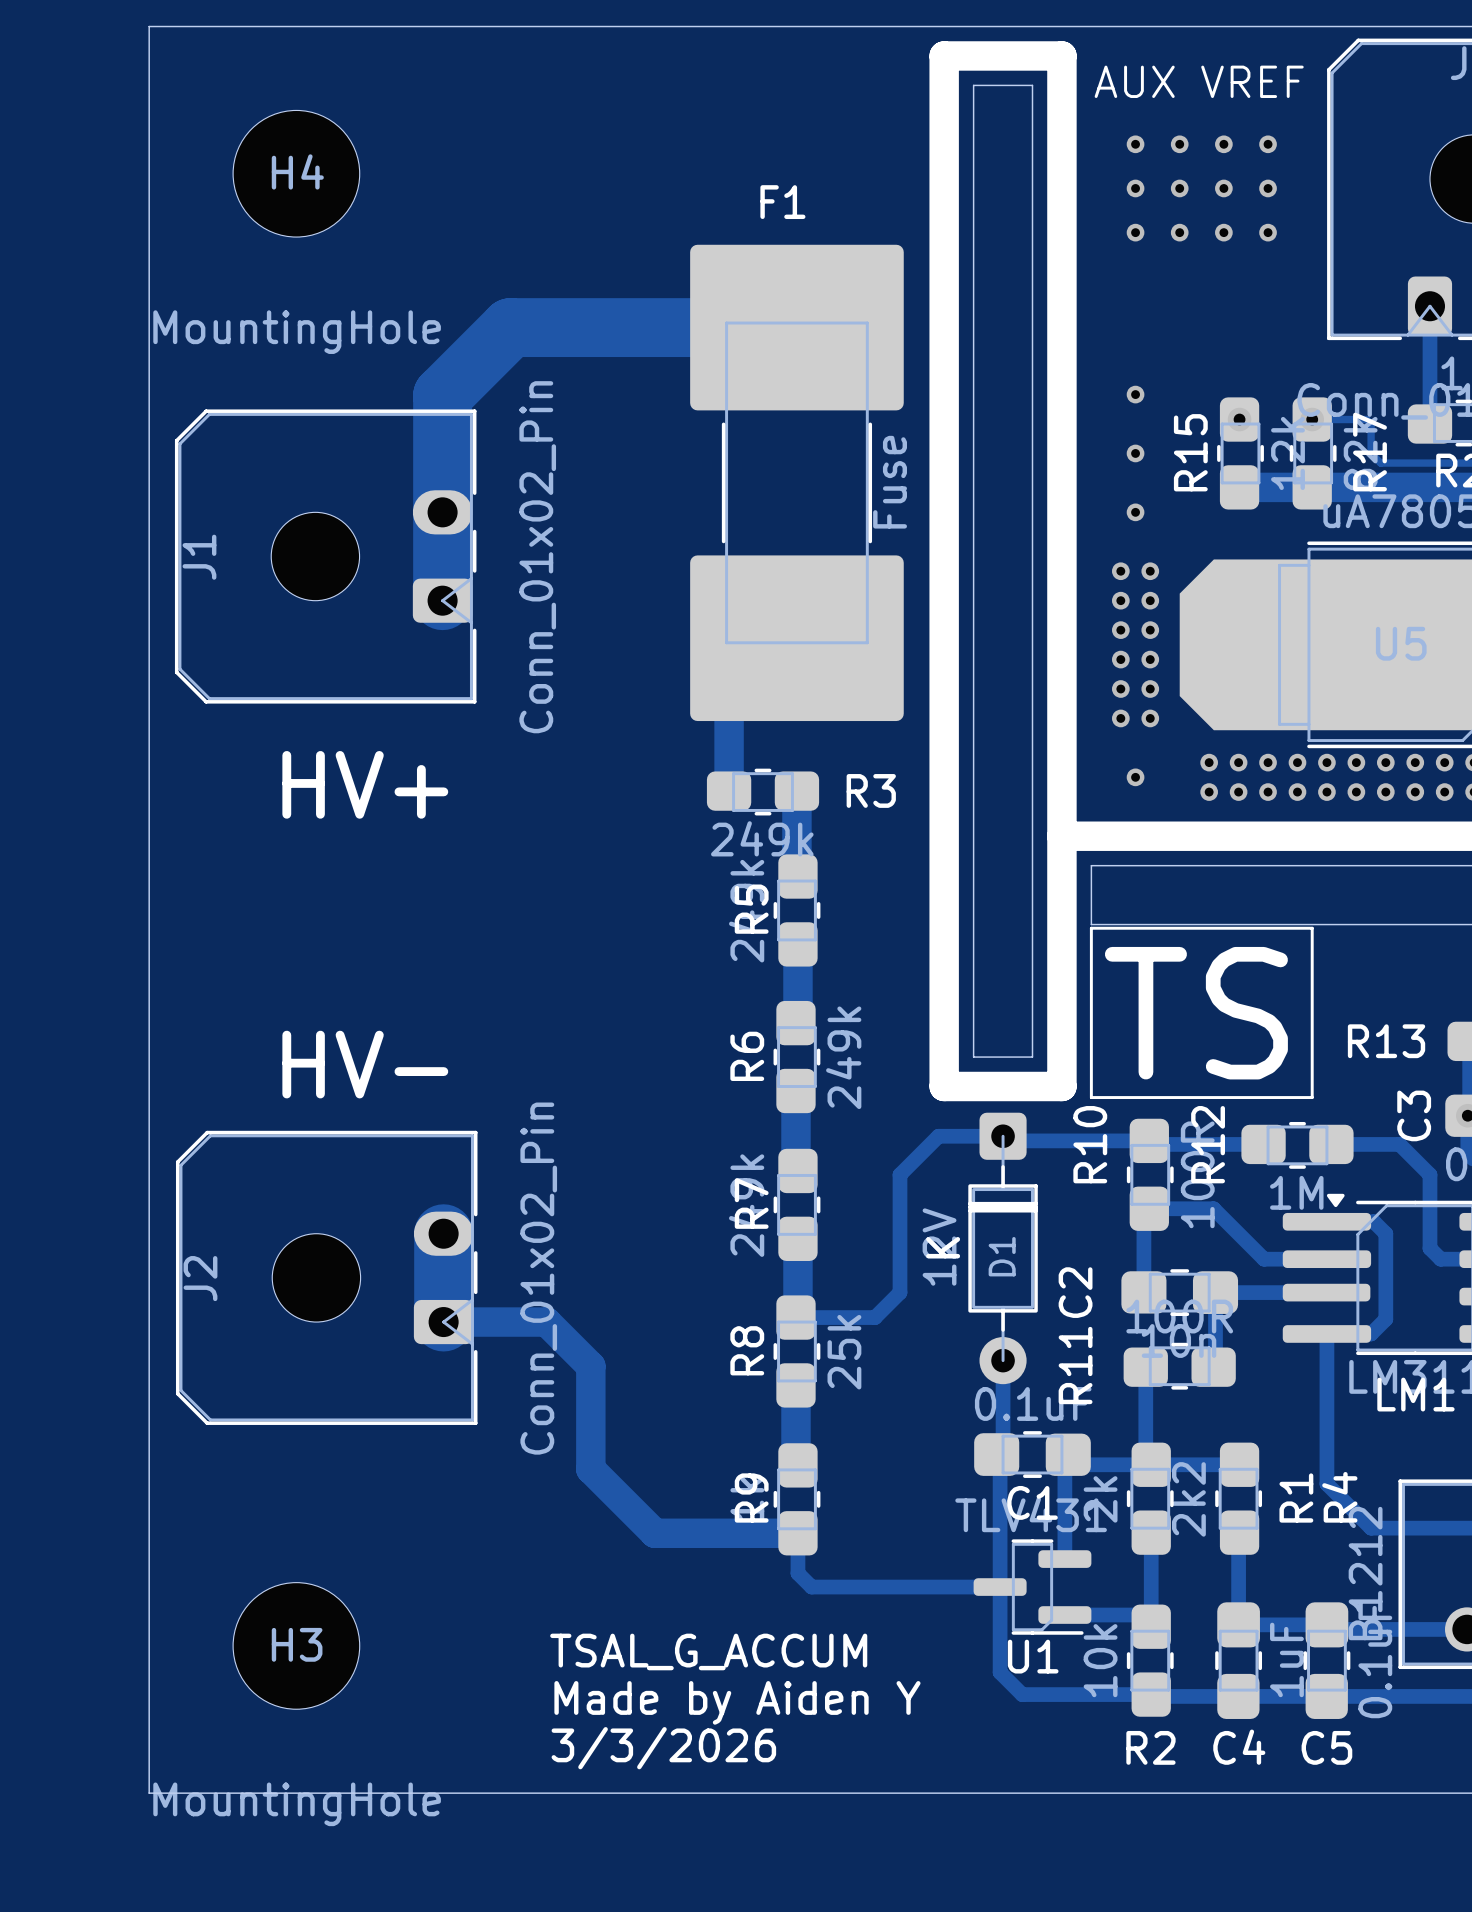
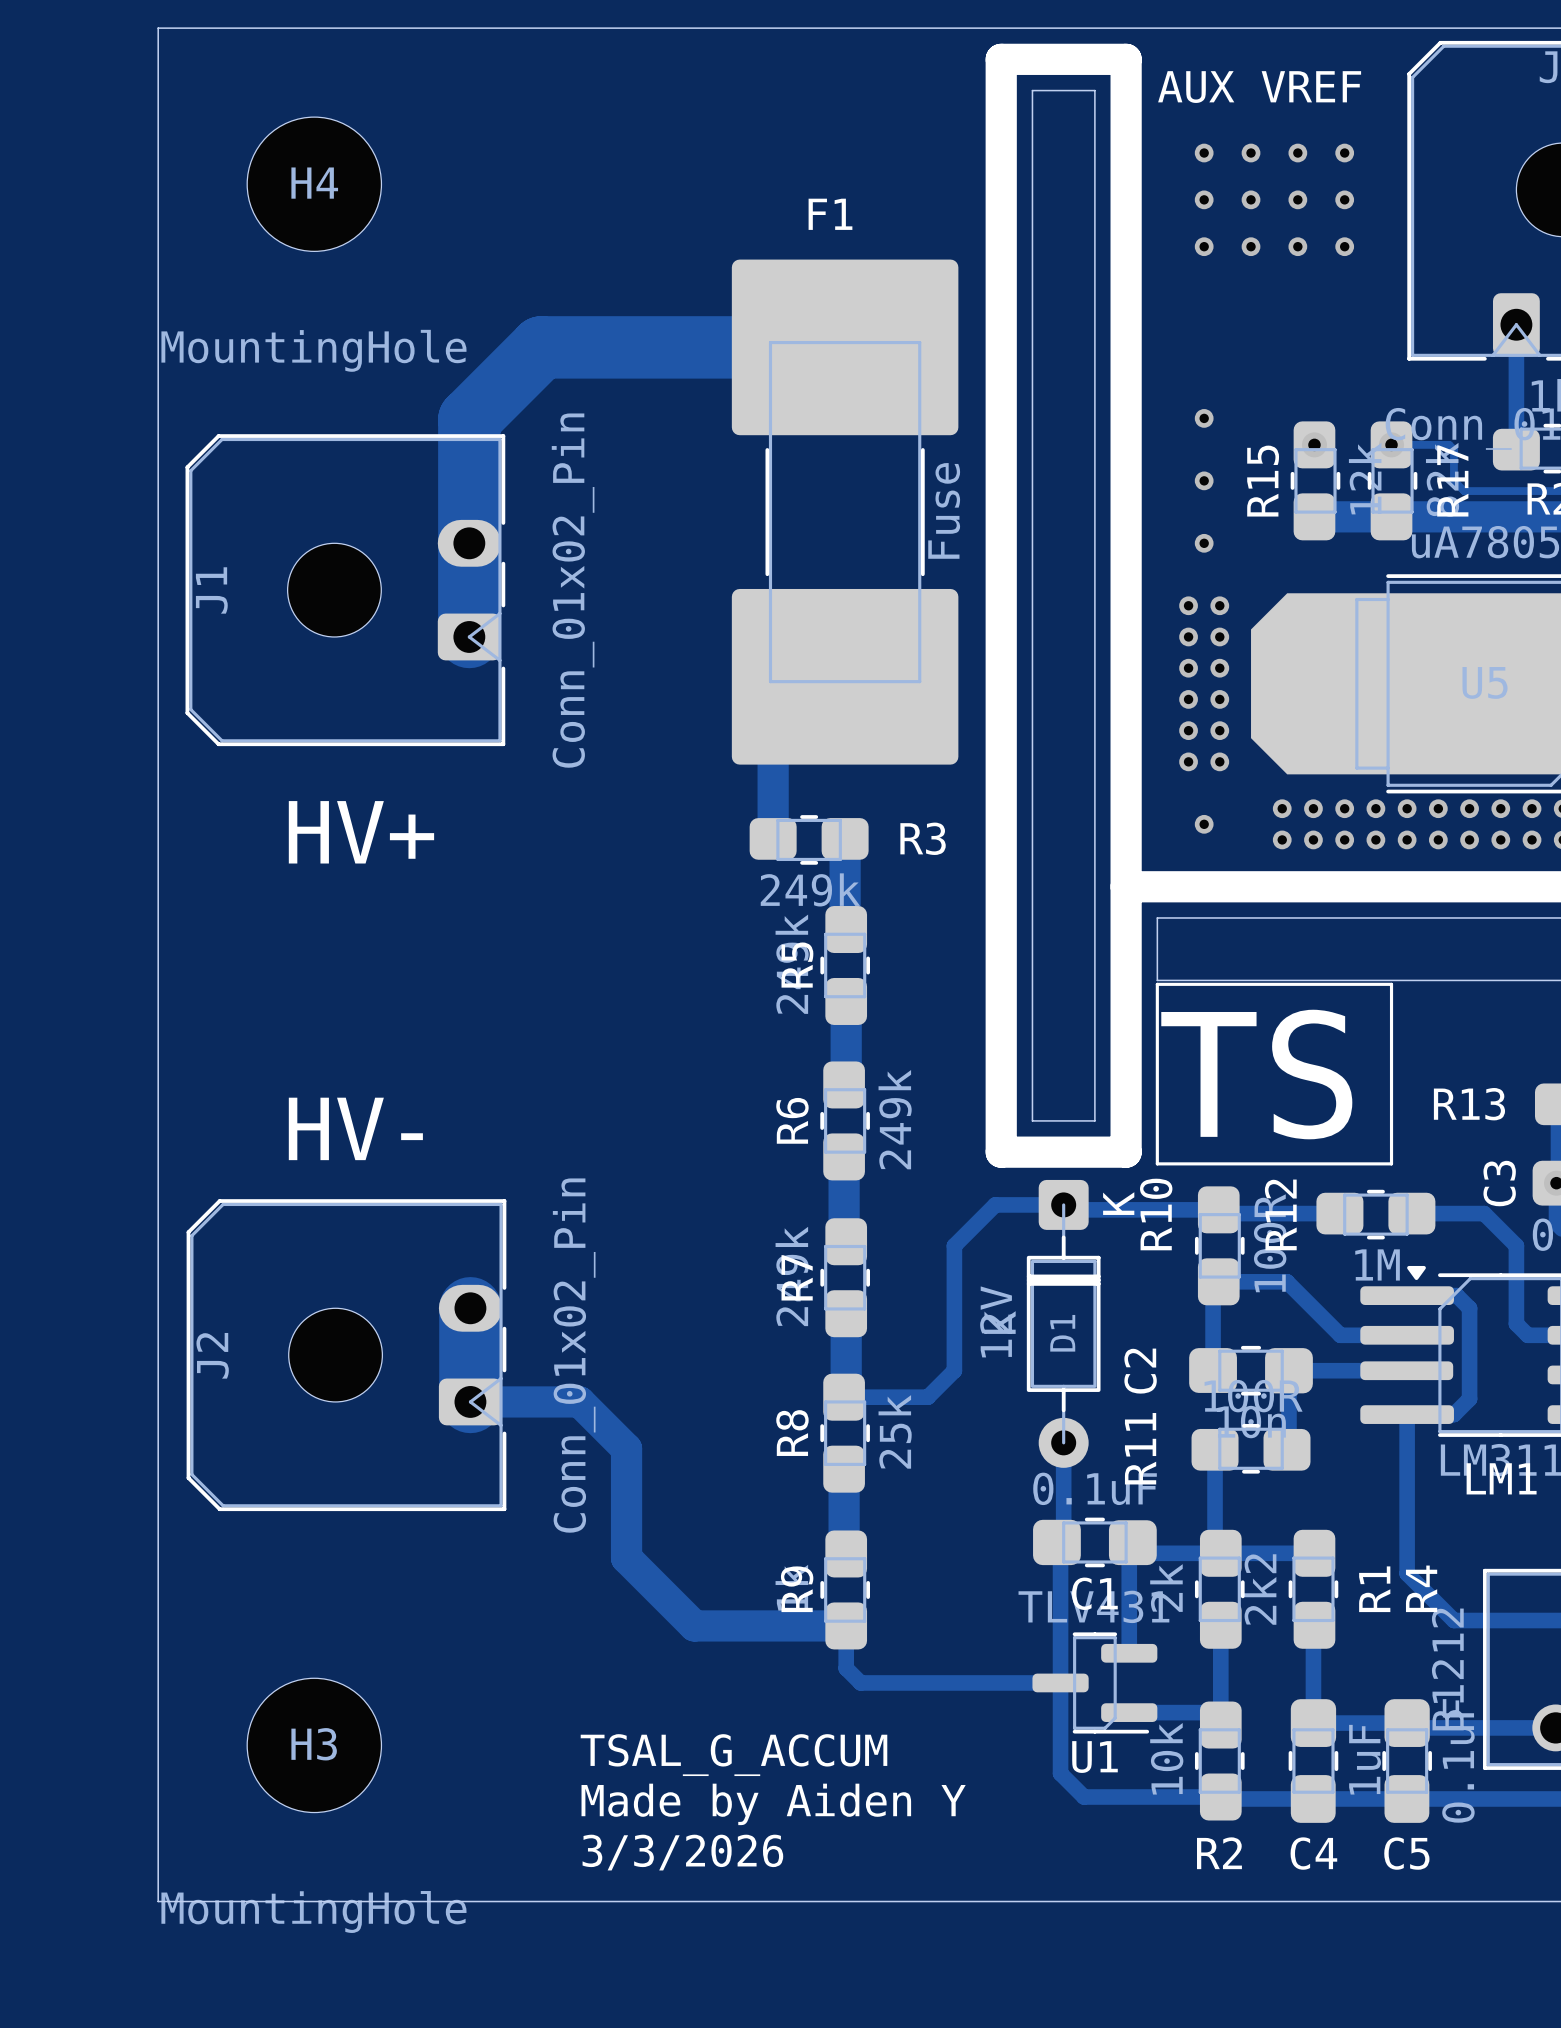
D1 footprint: [968, 1112, 1038, 1385] -> [1026, 1179, 1101, 1468]

